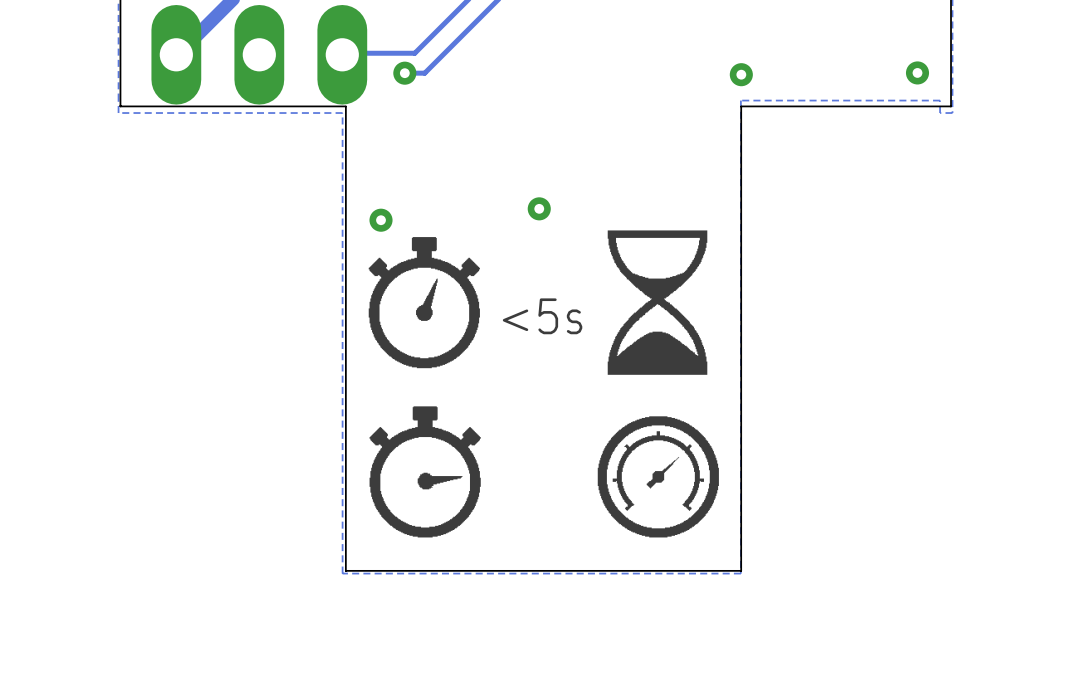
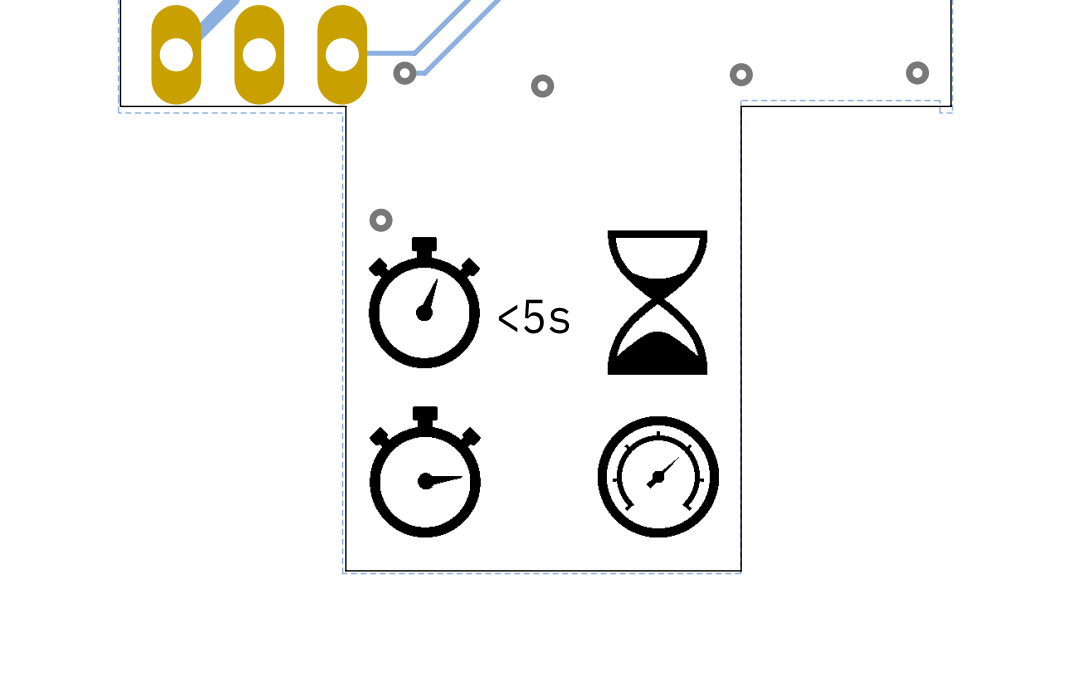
via: none -> (542, 86)
via: (539, 208) -> none

